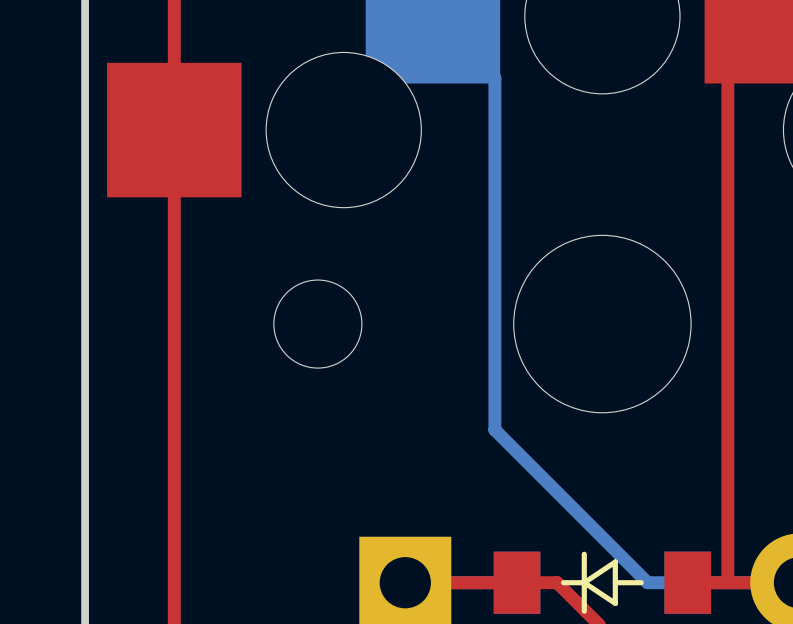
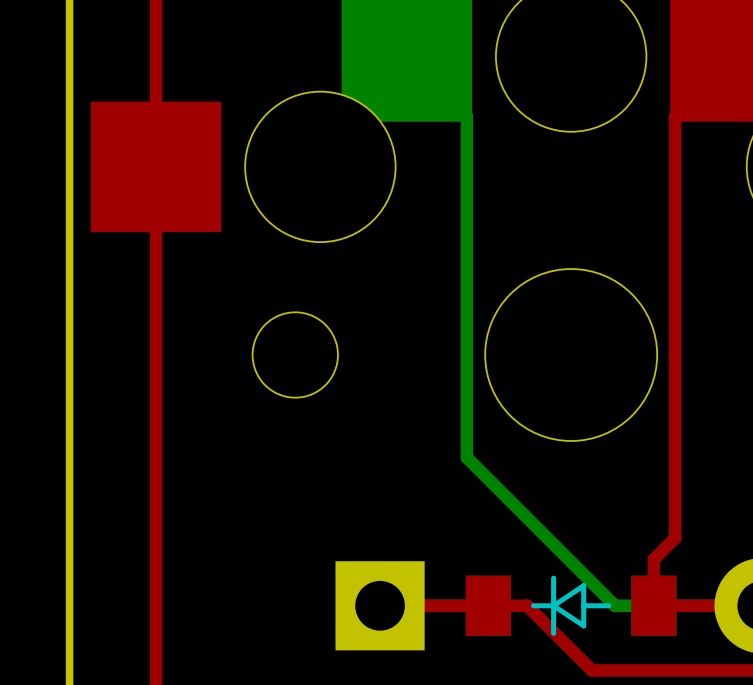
top track: (727, 60) (727, 582) -> (692, 99) (675, 116) (675, 538) (653, 559) (653, 605)

